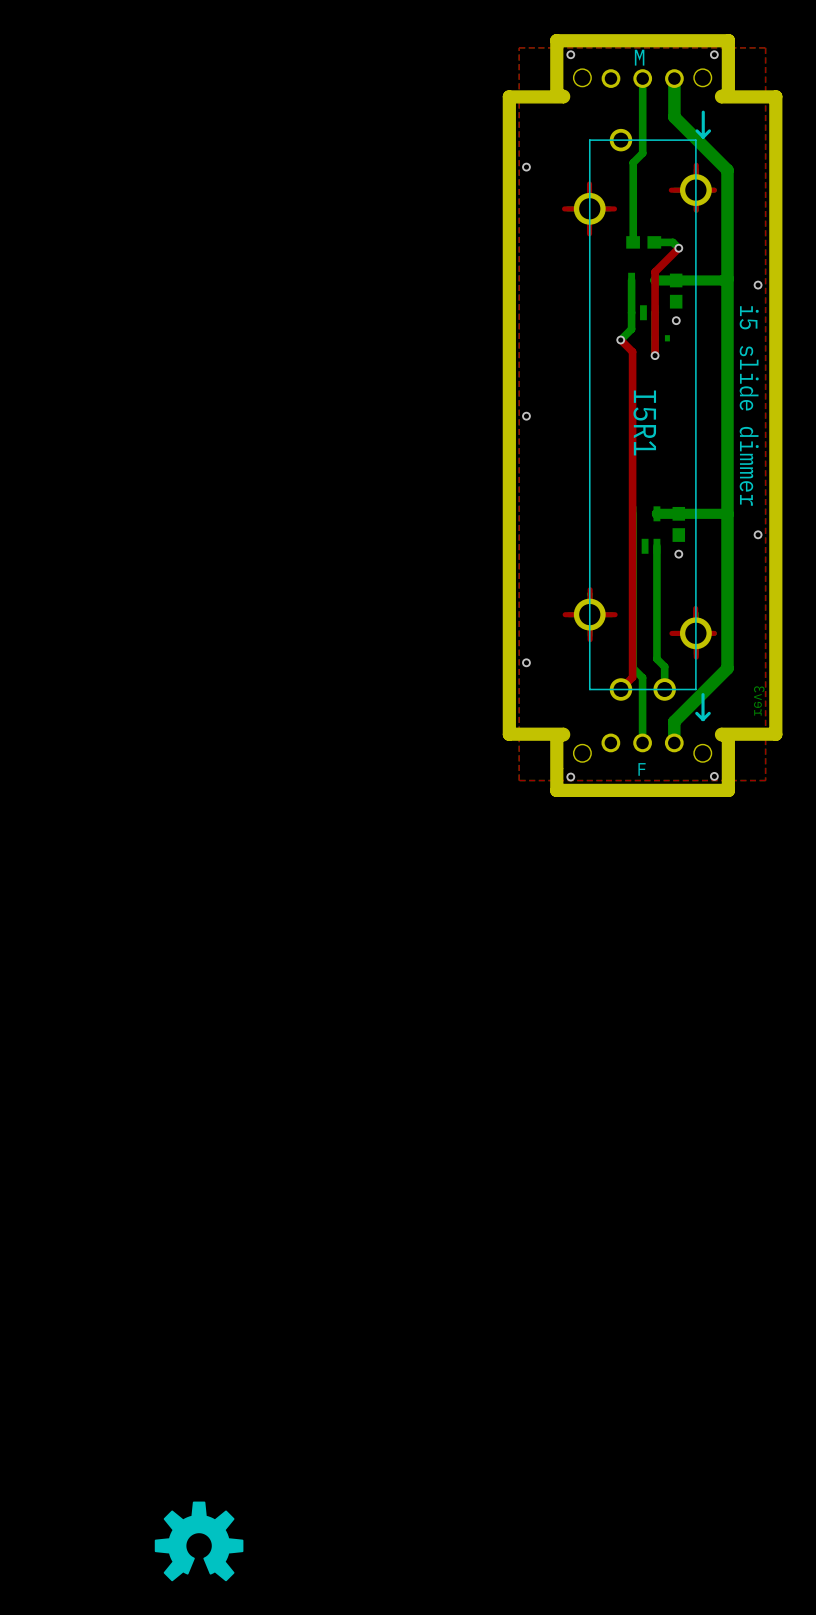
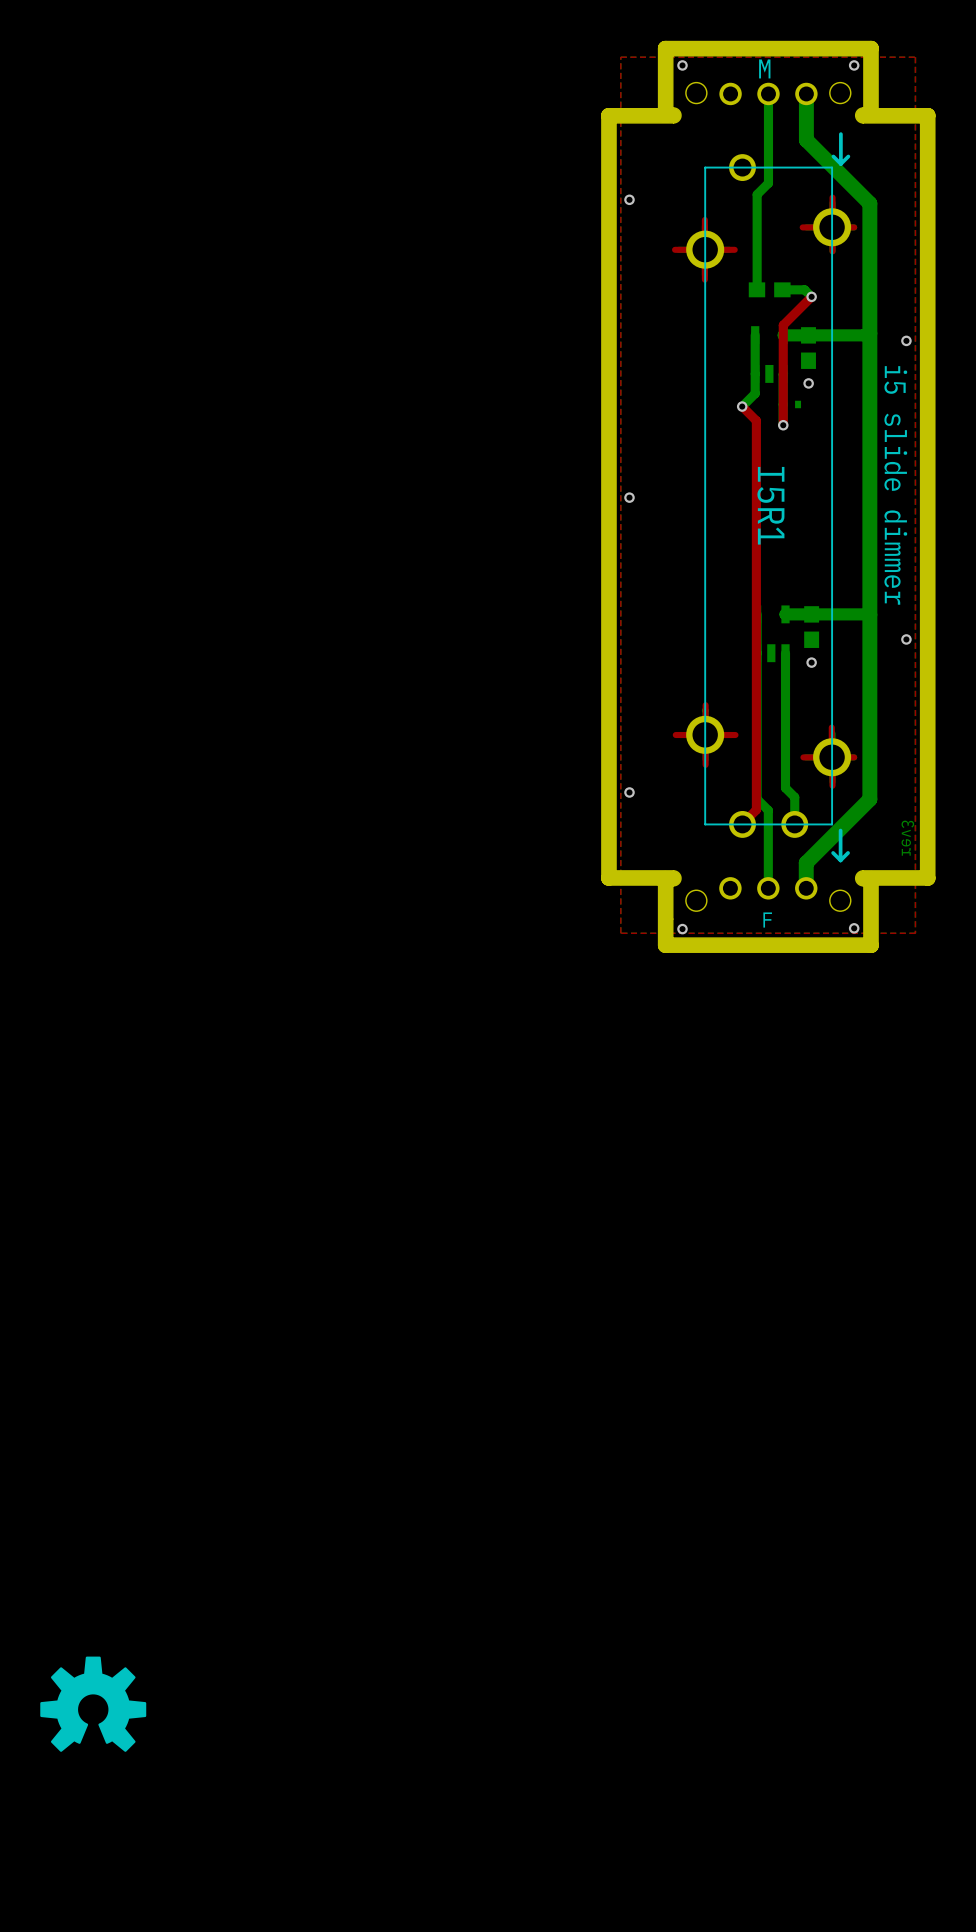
drawing position: (199, 1541) -> (93, 1704)

